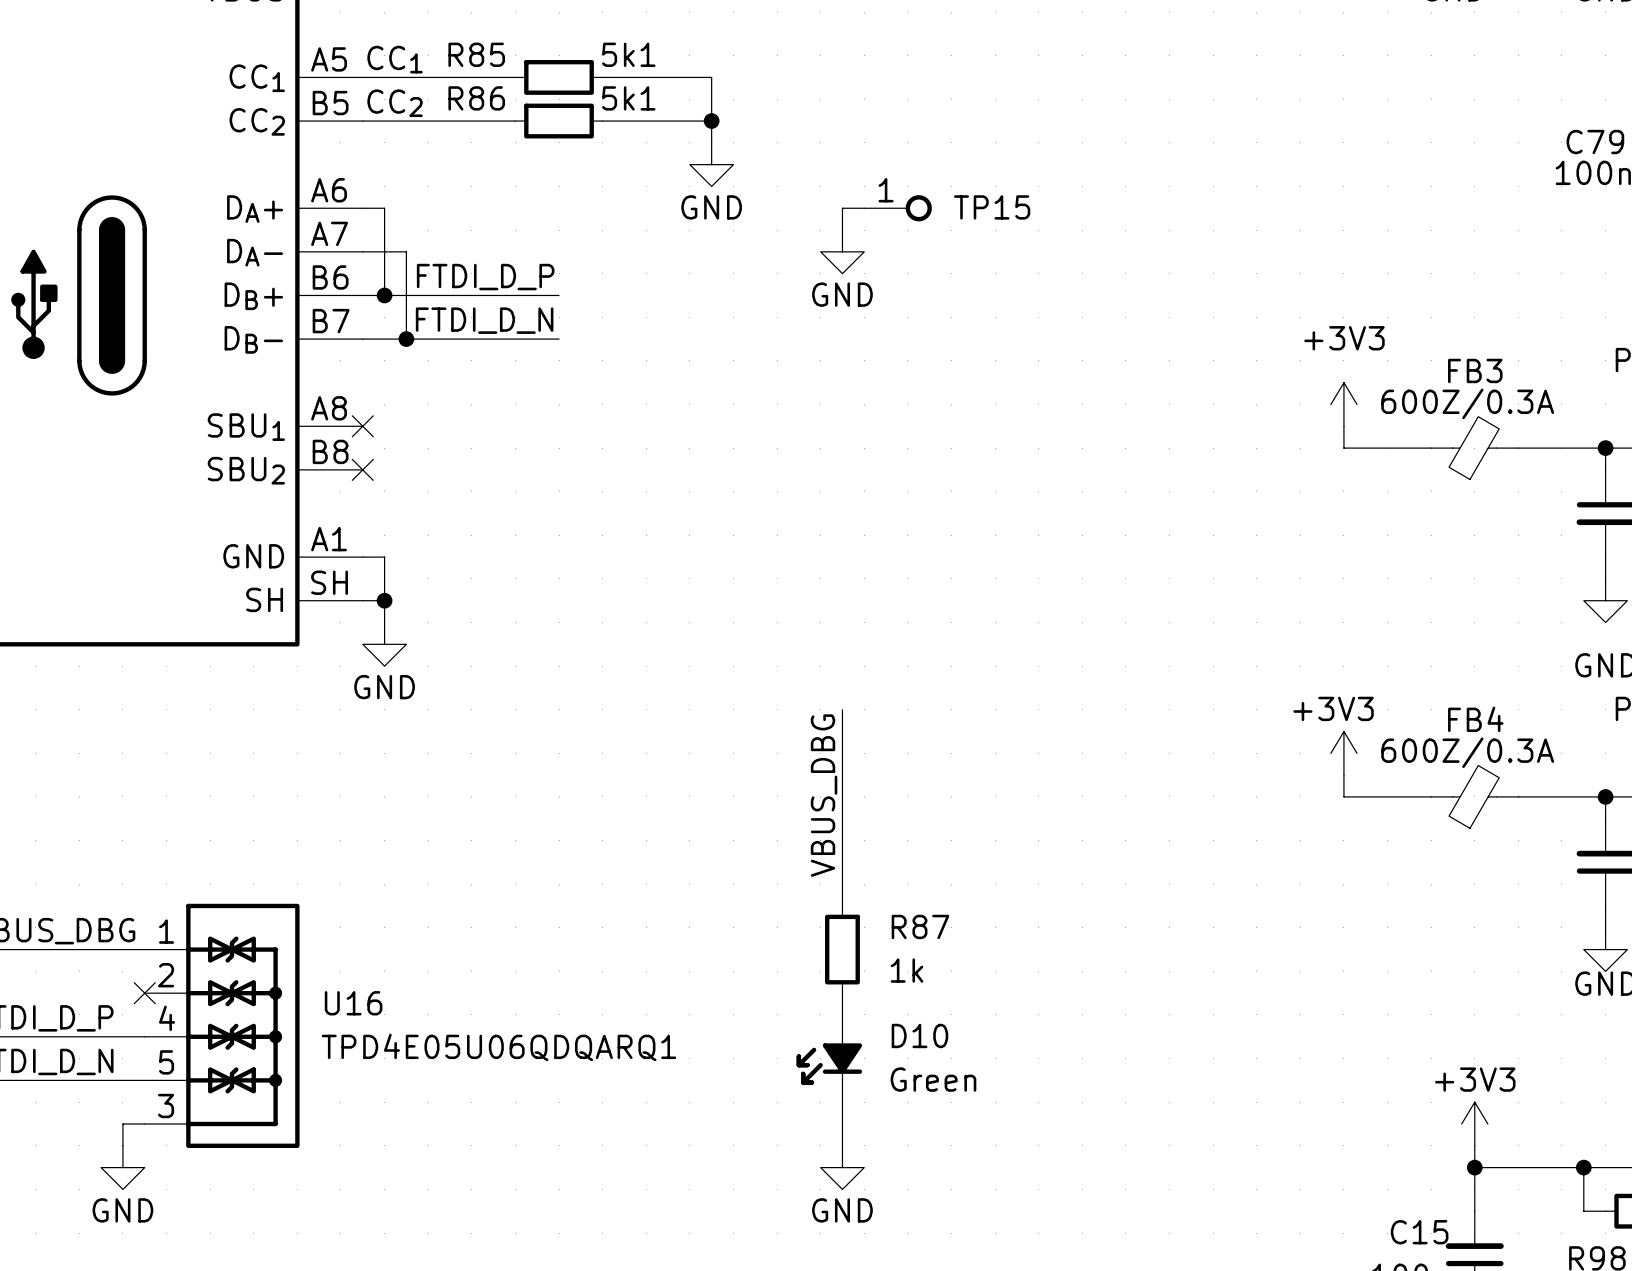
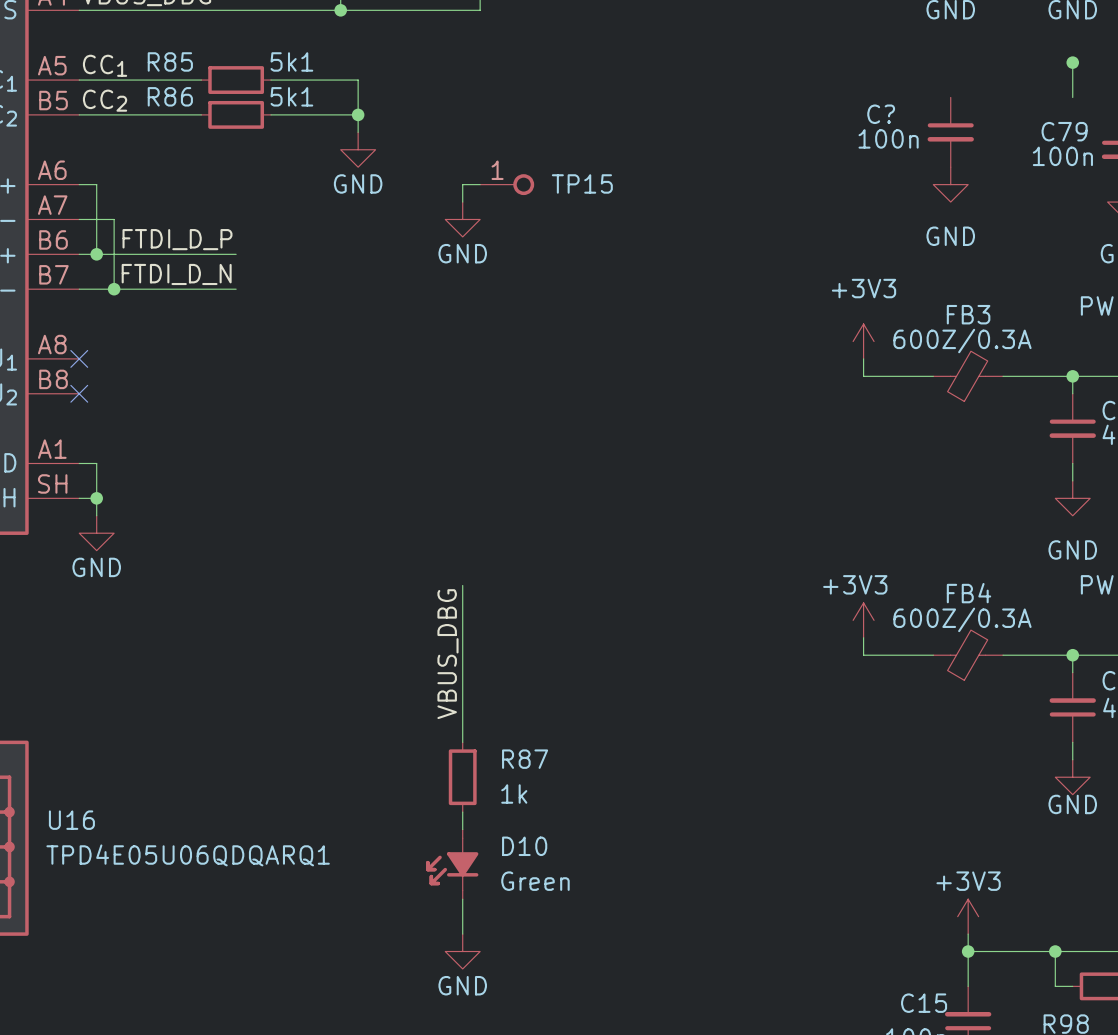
wire: none -> (1072, 62) (1072, 97)
junction: none -> (1072, 62)
C?: none -> (950, 132)
power symbol: none -> GND (950, 184)

